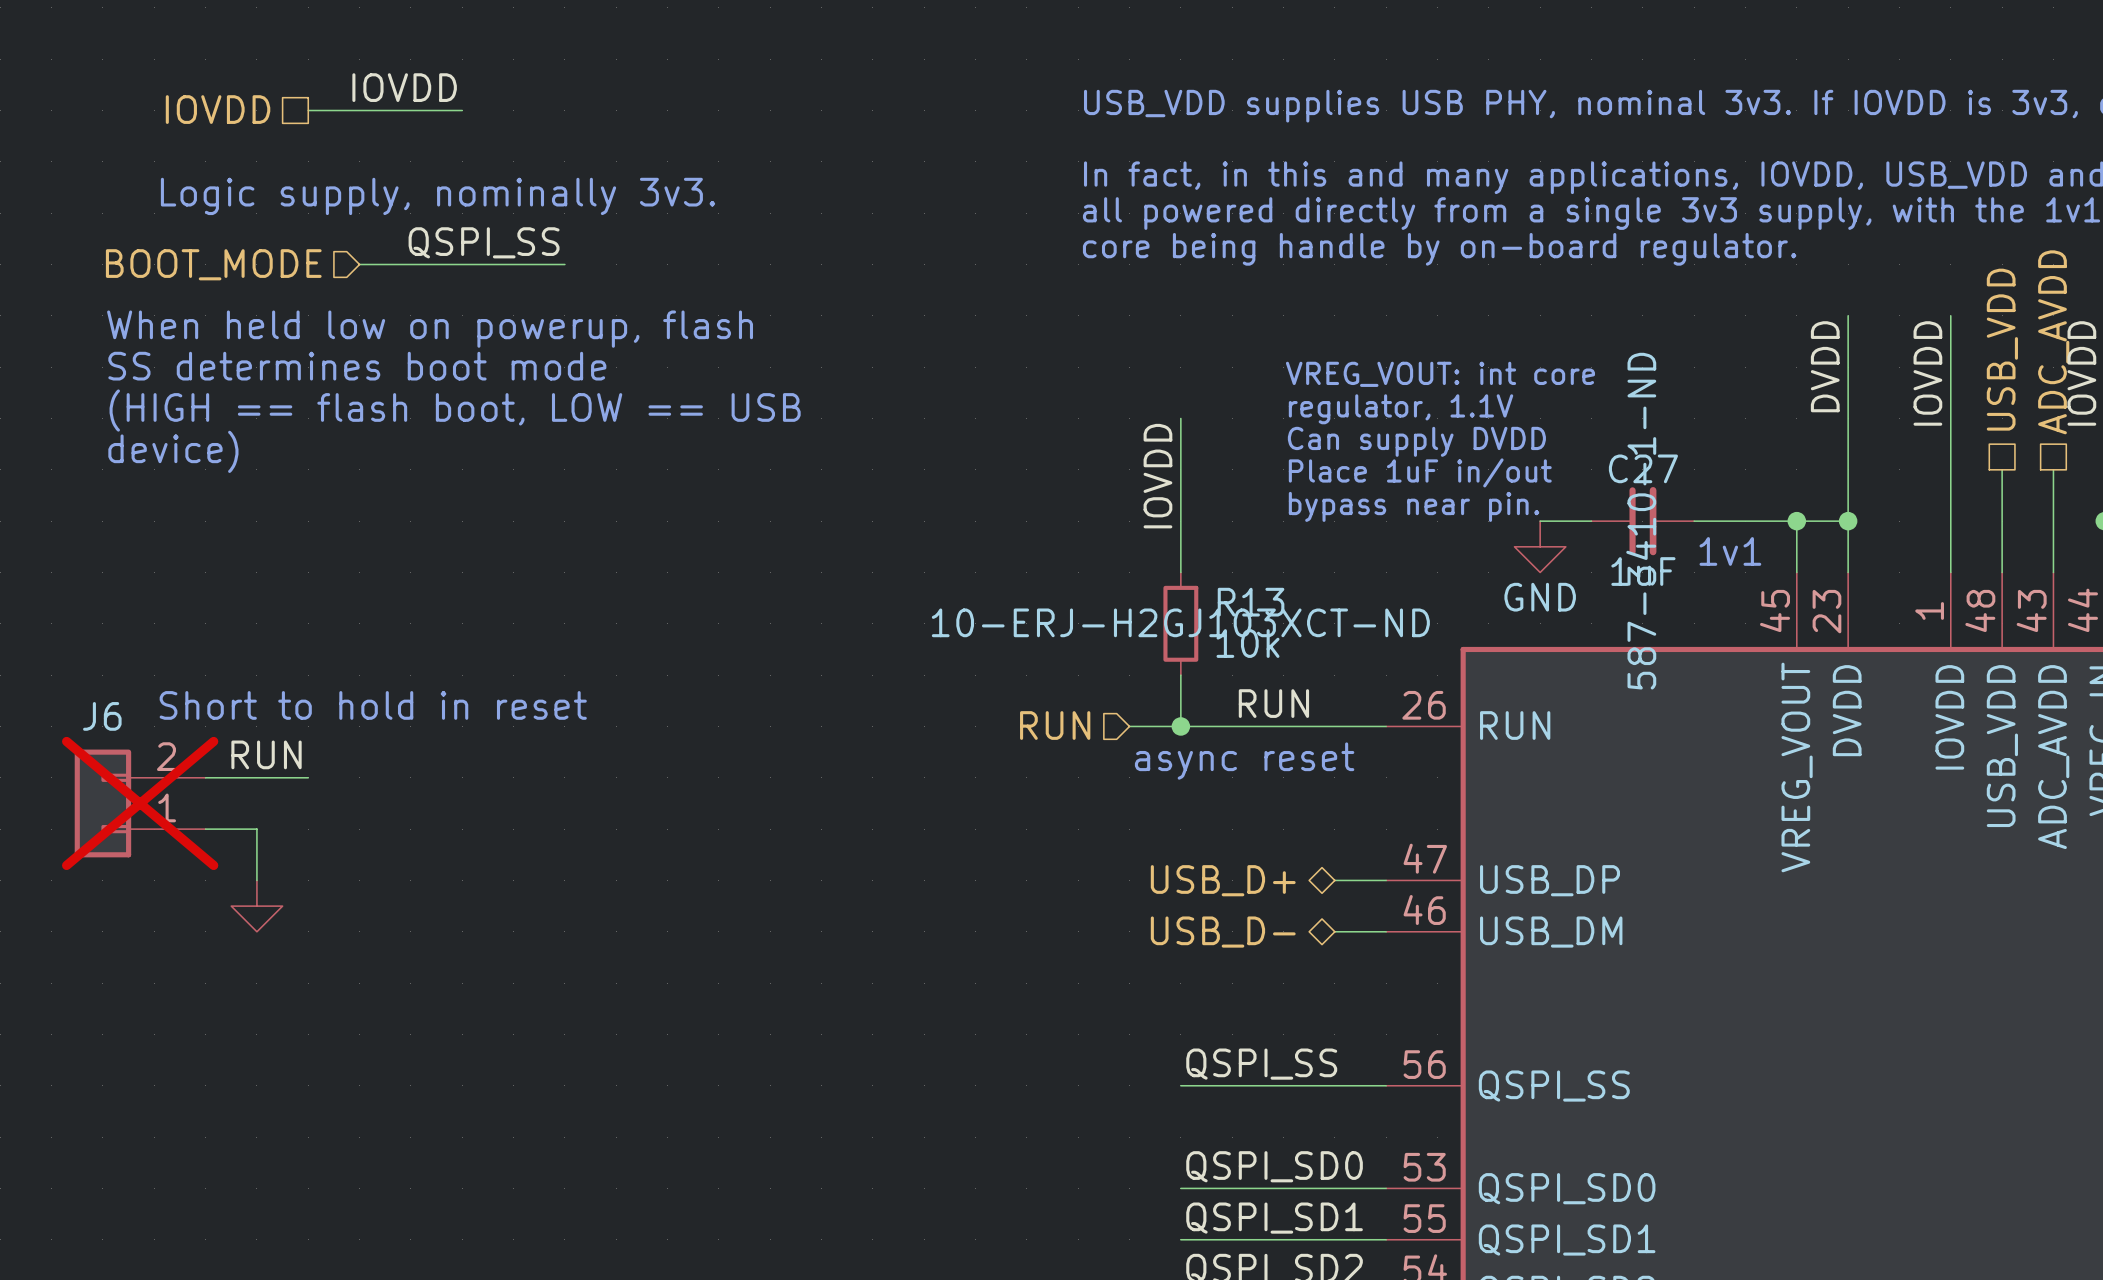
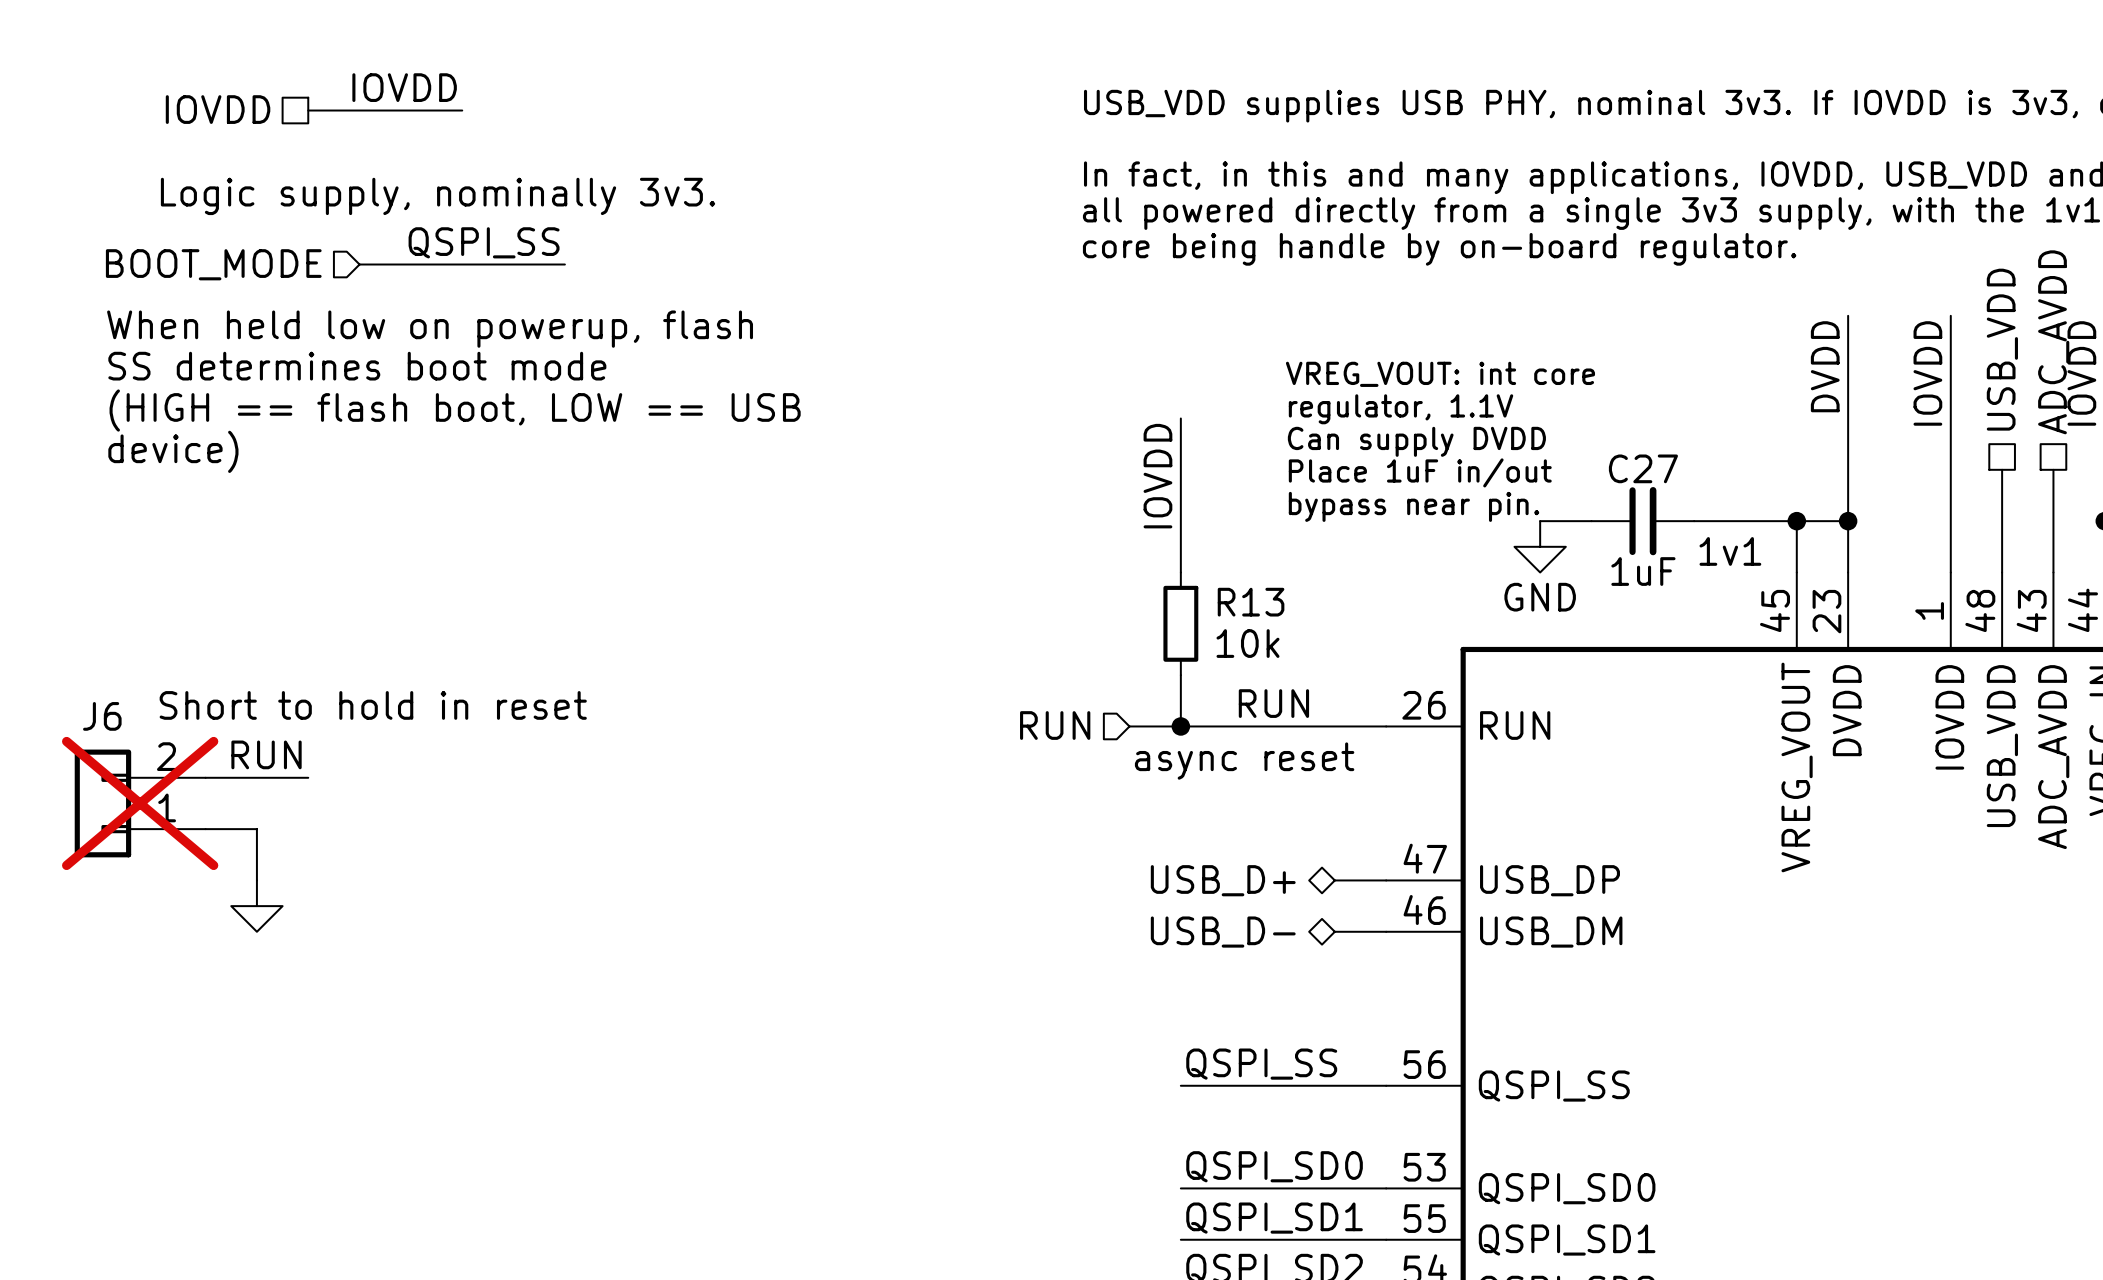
C27 text: 587-3410-1-ND (1641, 521) -> none
R13 text: 10-ERJ-H2GJ103XCT-ND (1180, 622) -> none

